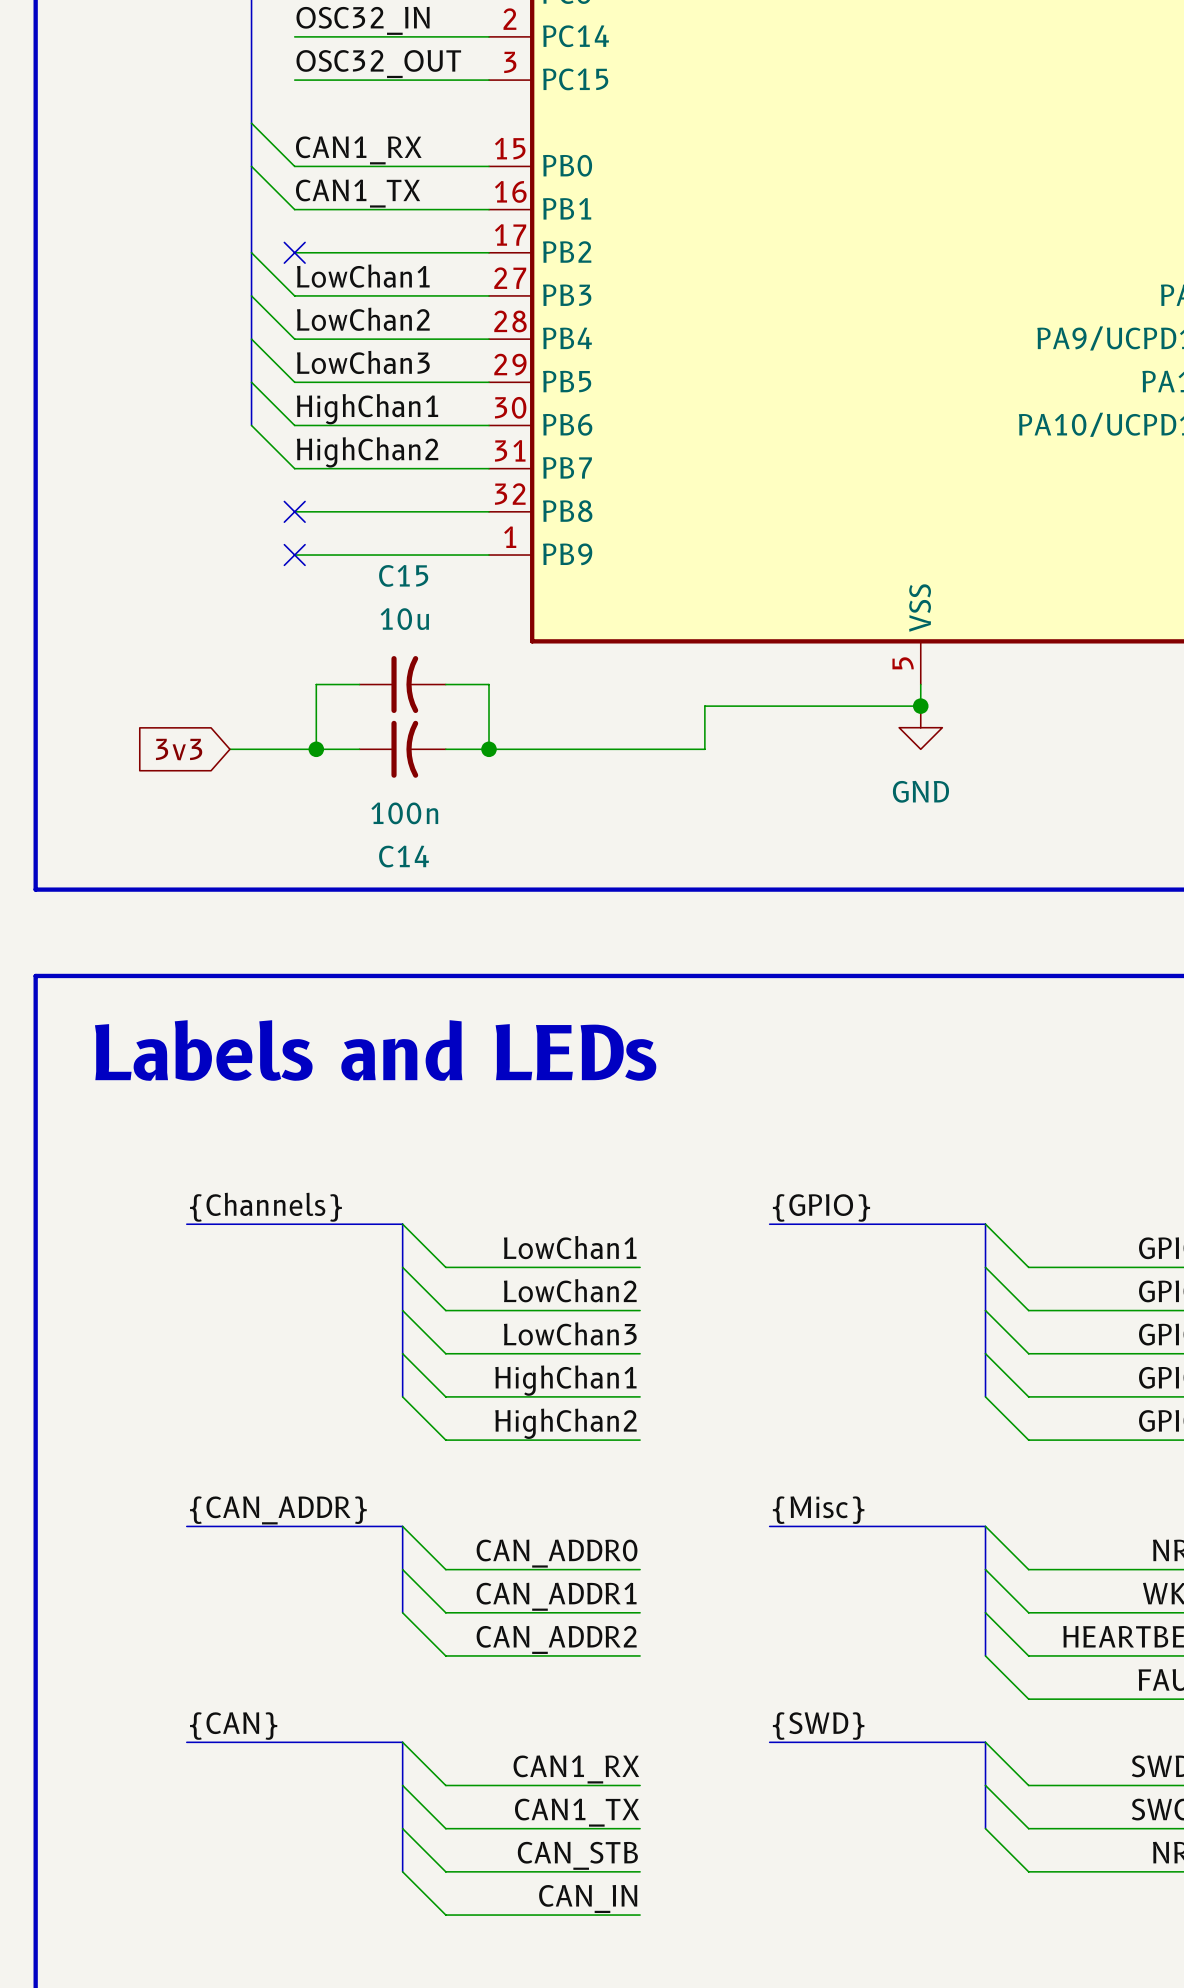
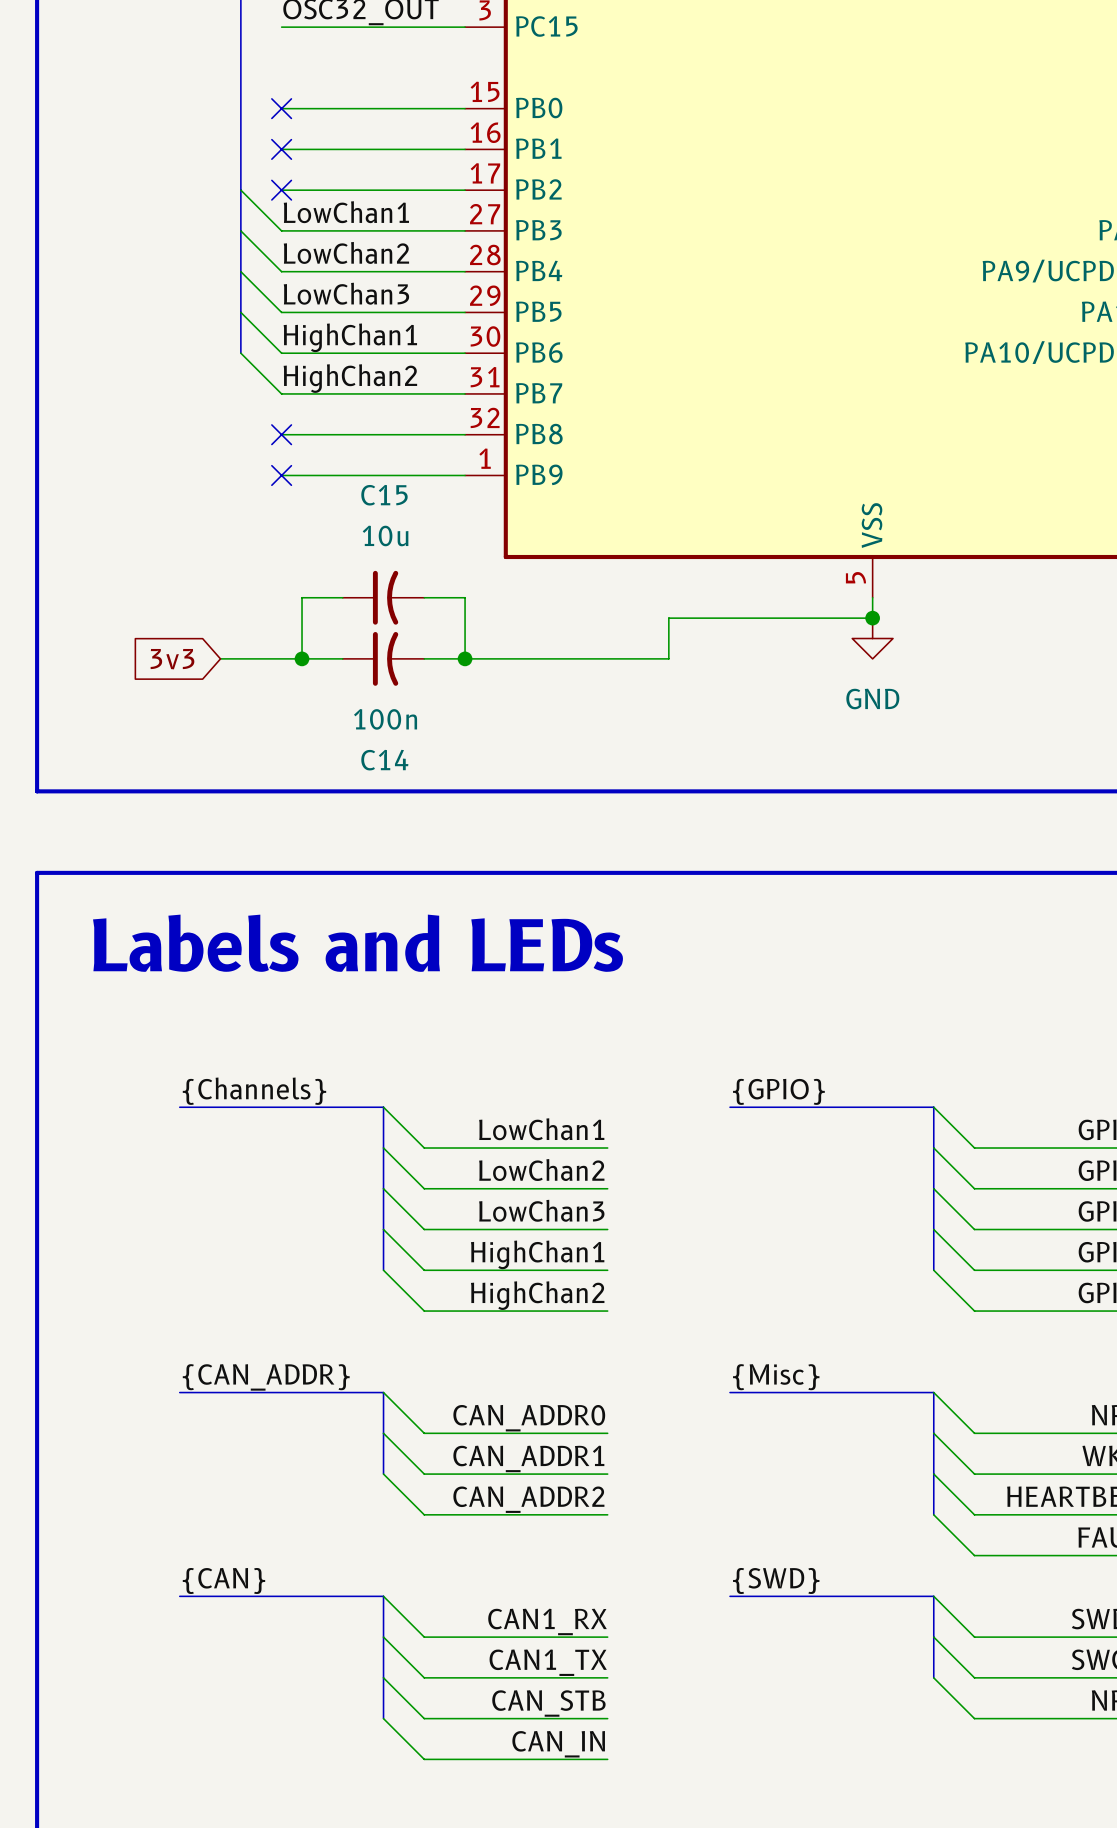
wire: (251, 123) (294, 166) -> none
label: CAN1_RX (358, 150) -> none
wire: (251, 166) (294, 209) -> none
no-connect mark: none -> (281, 108)
label: CAN1_TX (358, 193) -> none
no-connect mark: none -> (281, 149)

